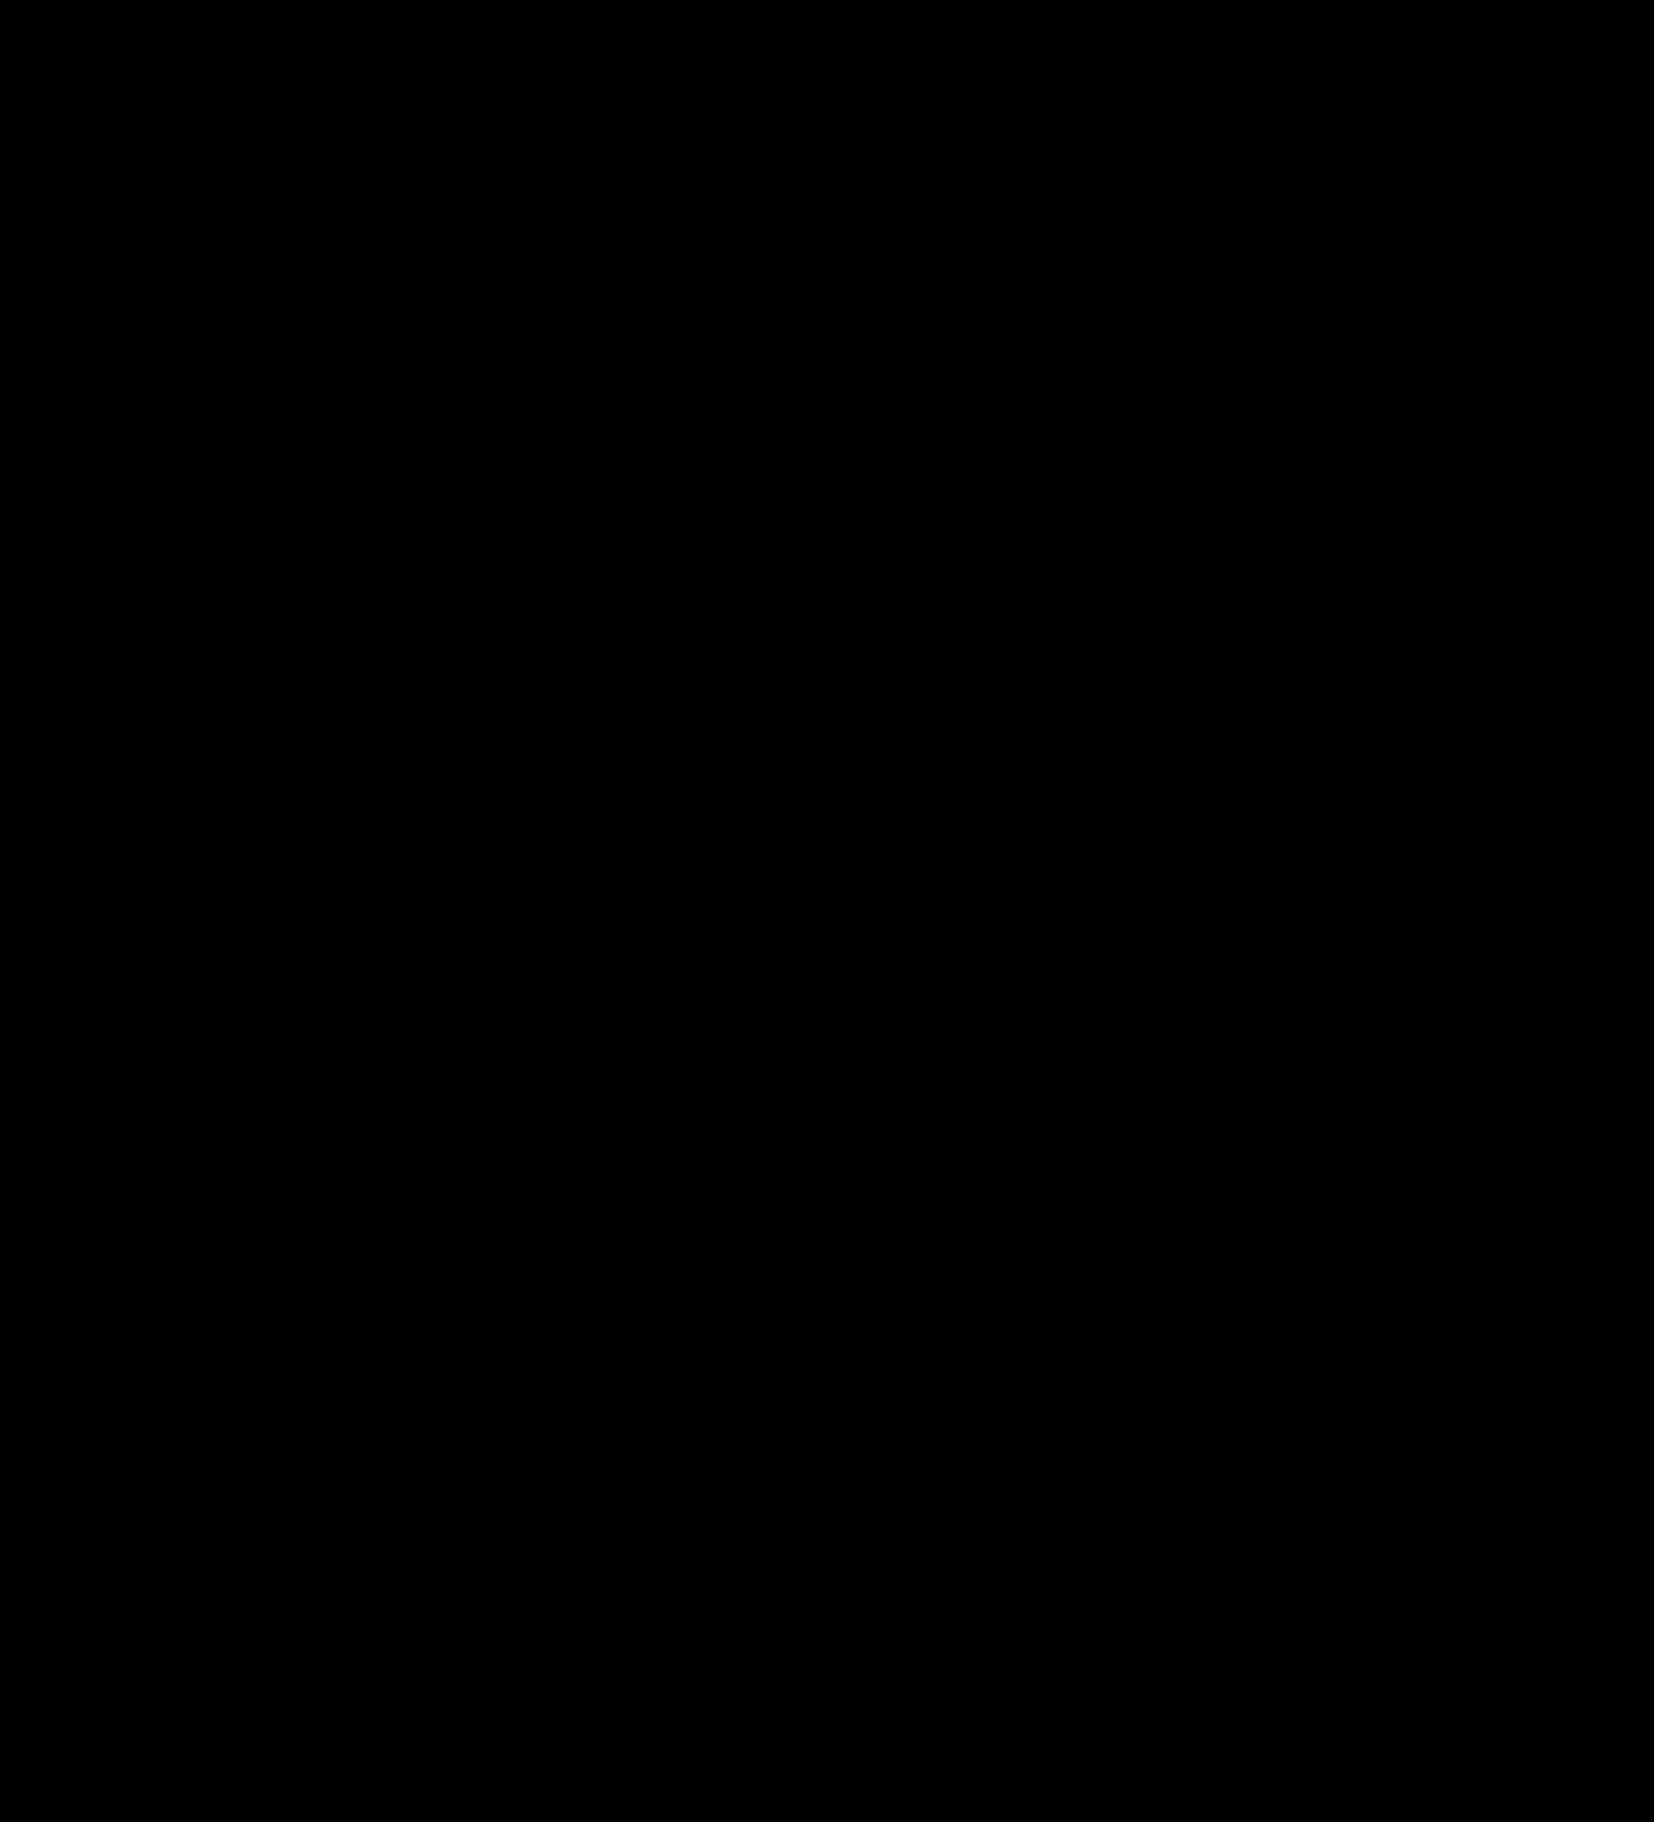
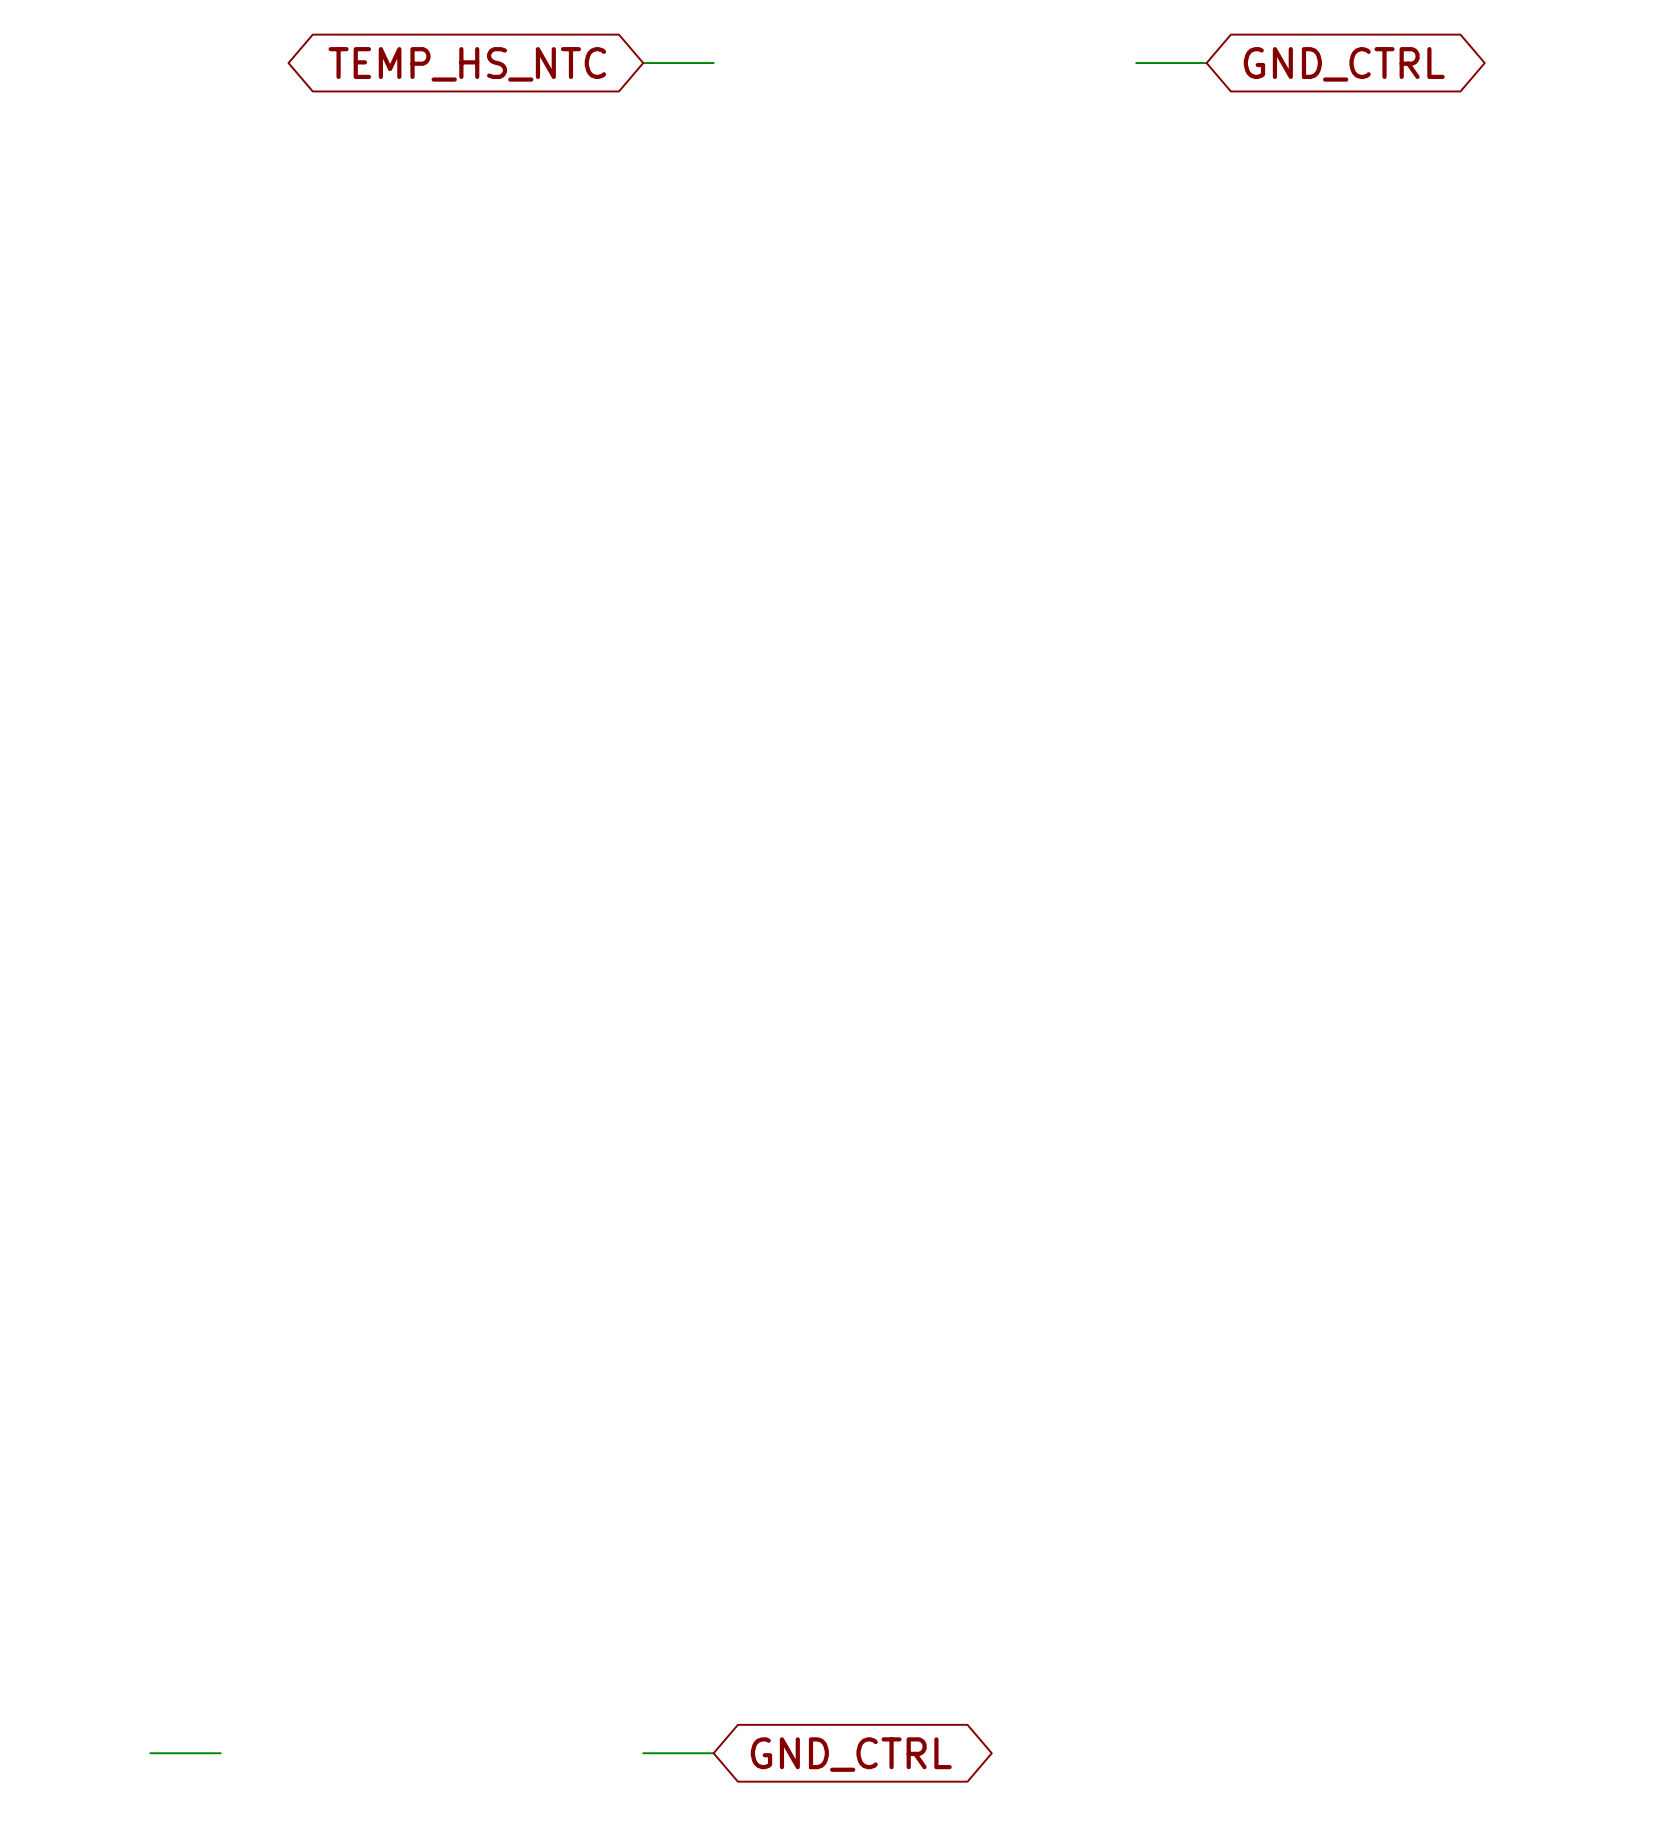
wire: none -> (643, 63) (713, 63)
wire: none -> (1136, 63) (1206, 63)
global label: none -> TEMP_HS_NTC (467, 64)
global label: none -> GND_CTRL (1344, 64)
wire: none -> (150, 1753) (220, 1753)
wire: none -> (643, 1753) (713, 1753)
global label: none -> GND_CTRL (851, 1754)

